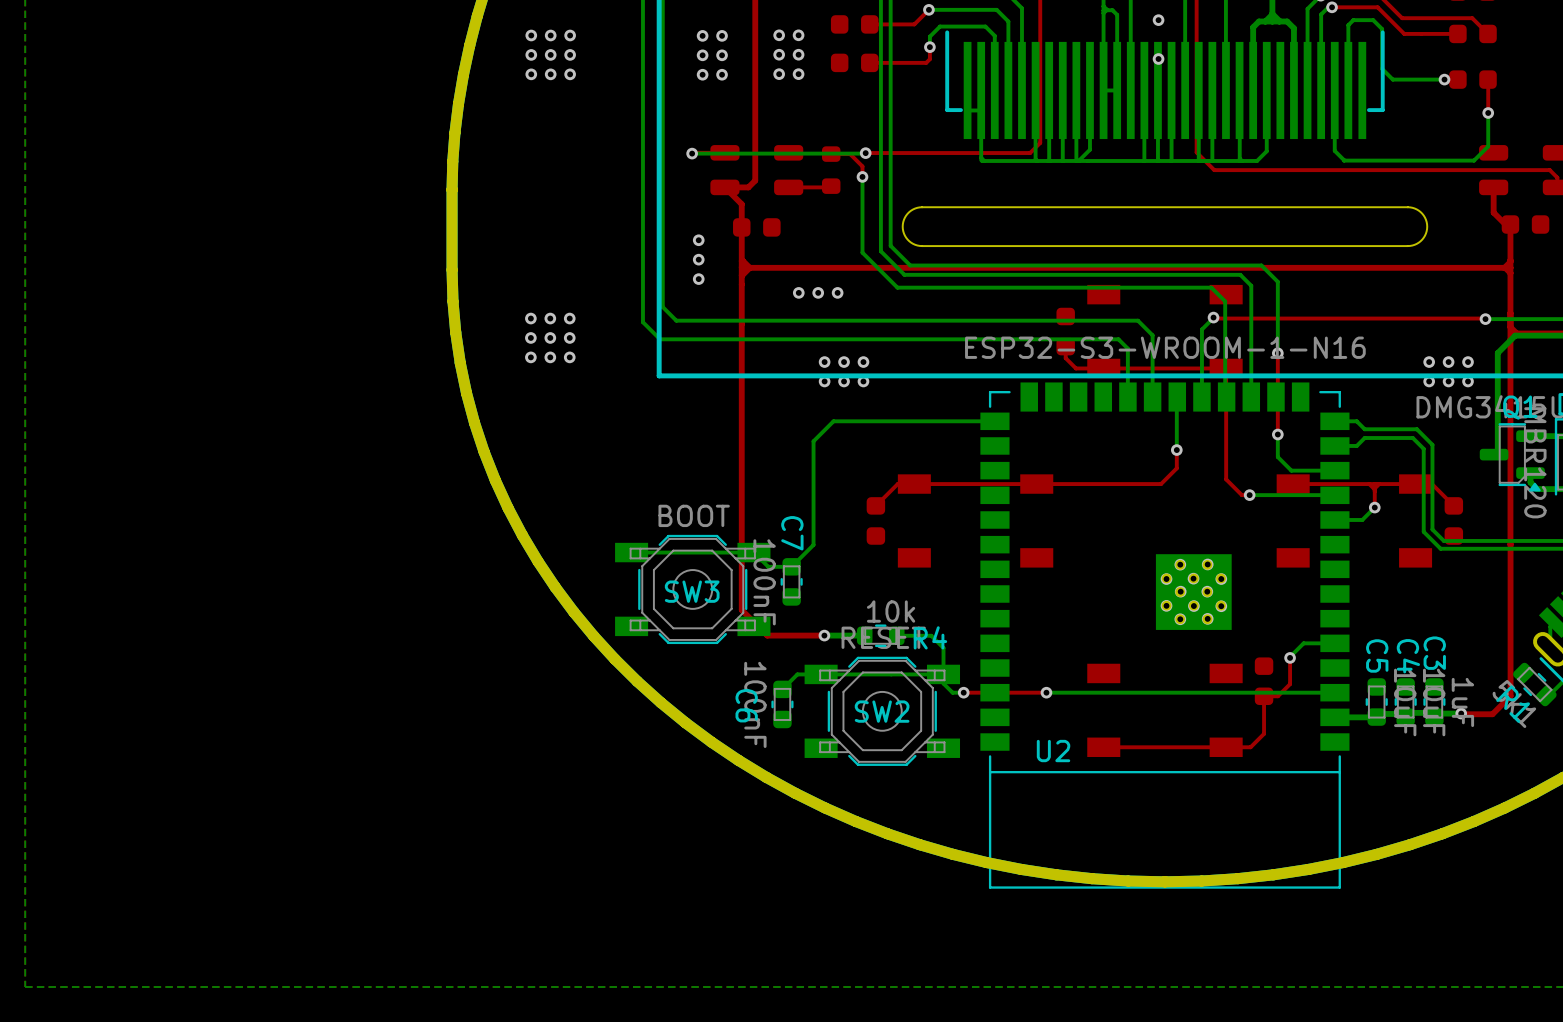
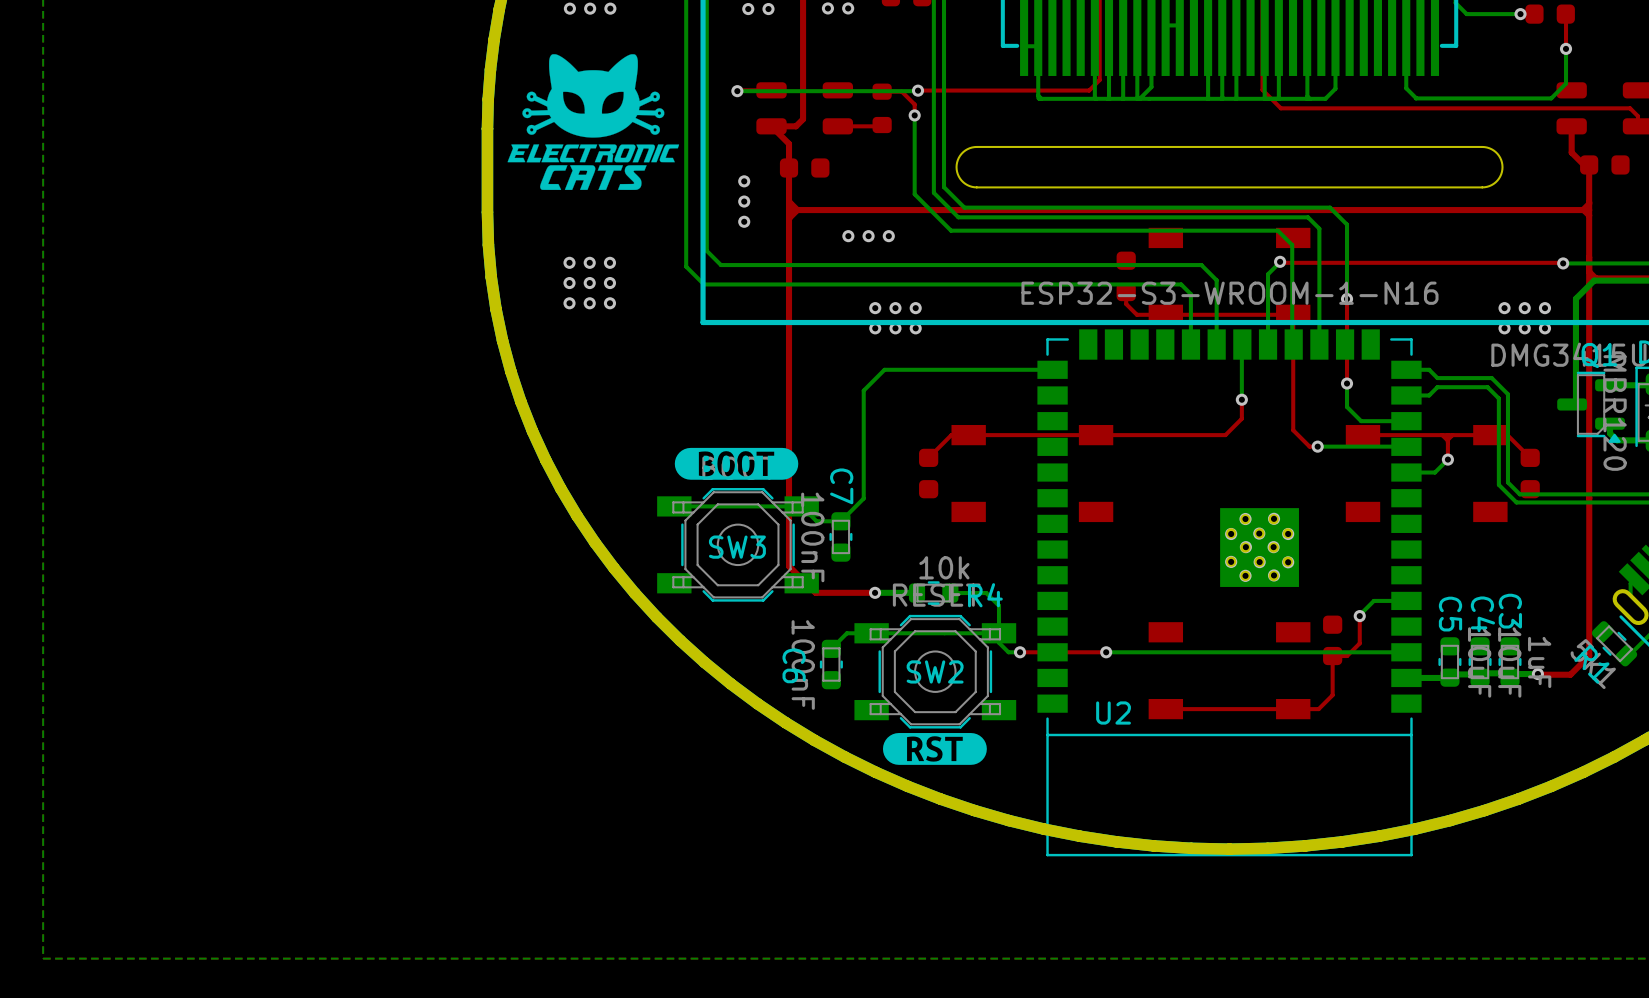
drawing: none -> [507, 54, 680, 190]
drawing: none -> [674, 447, 799, 480]
drawing: none -> [882, 733, 987, 765]

